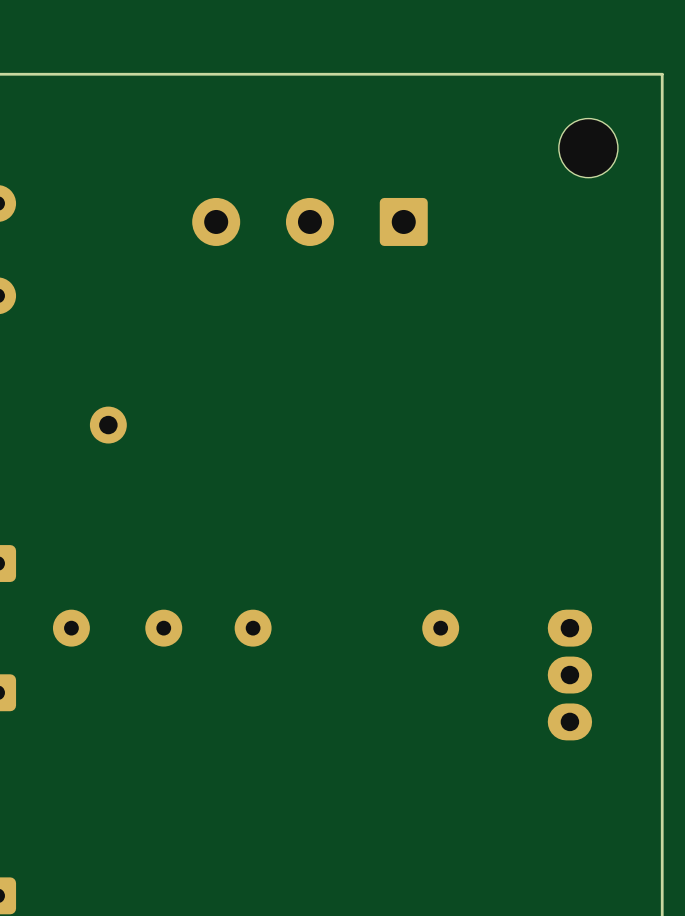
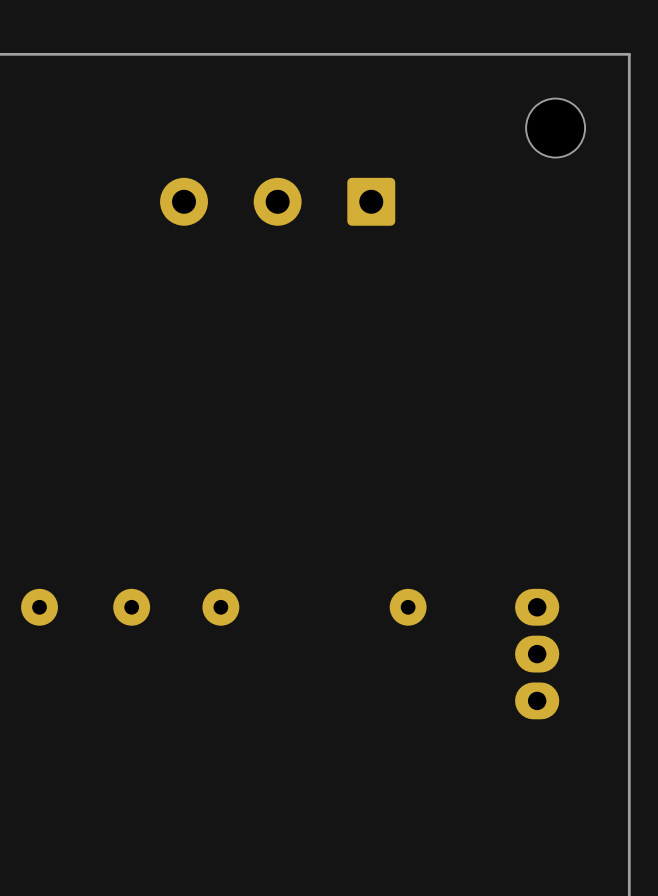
part: (108, 425) -> none

